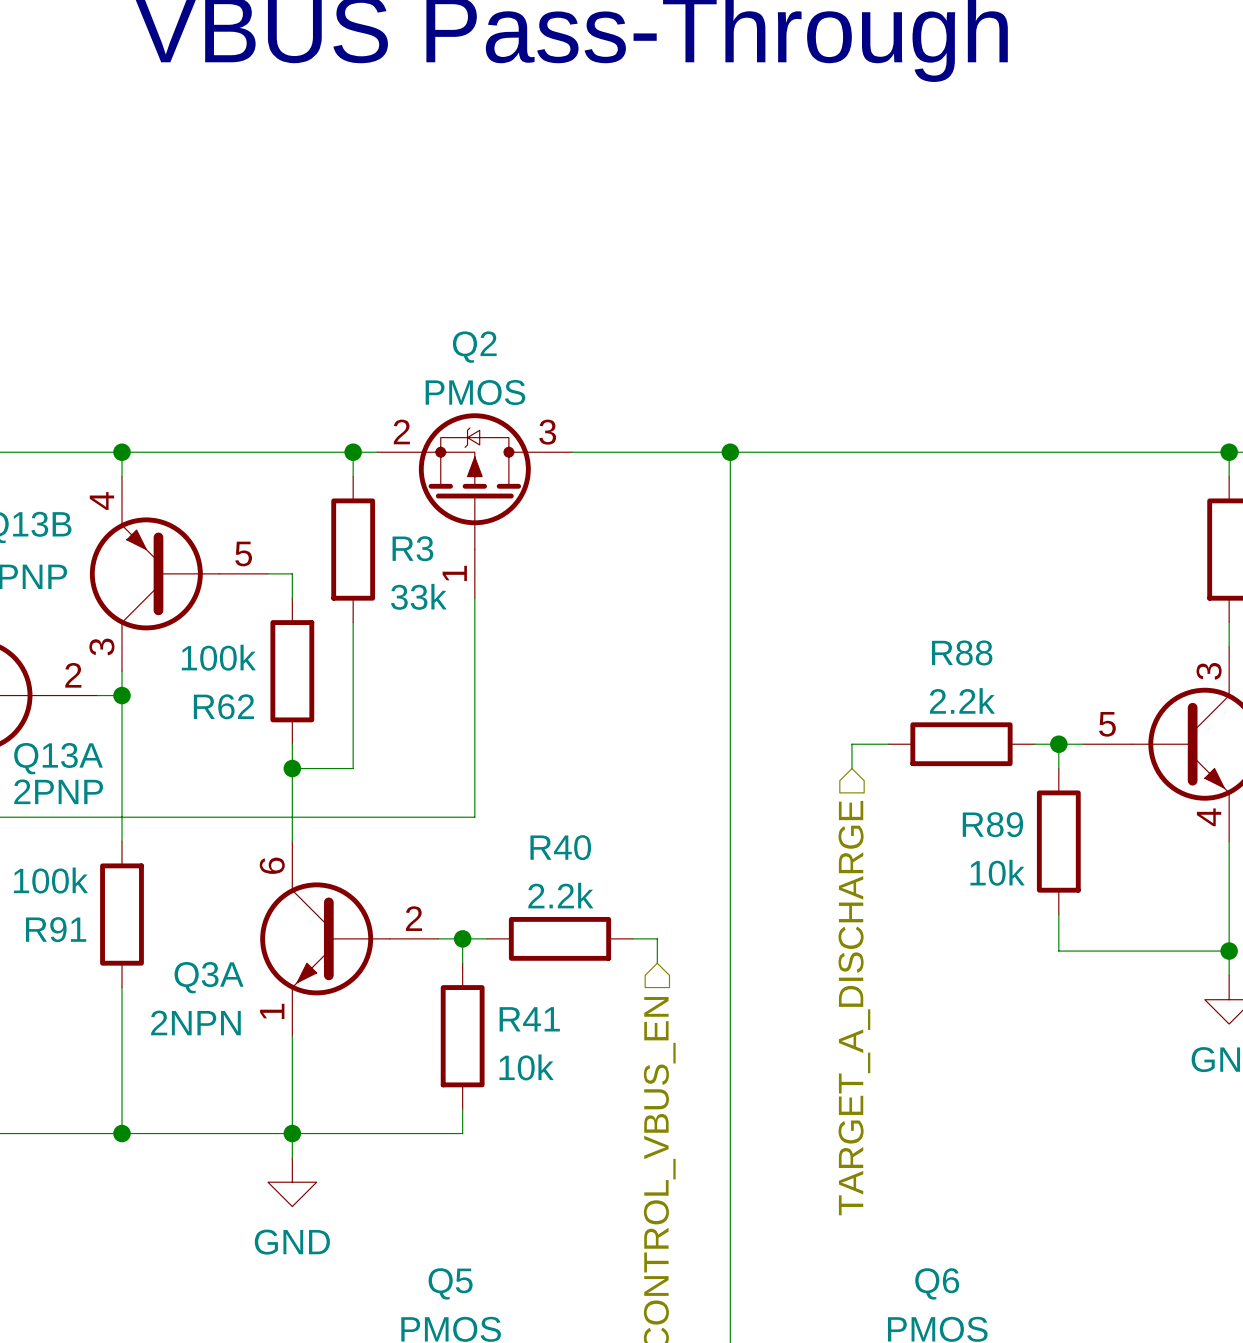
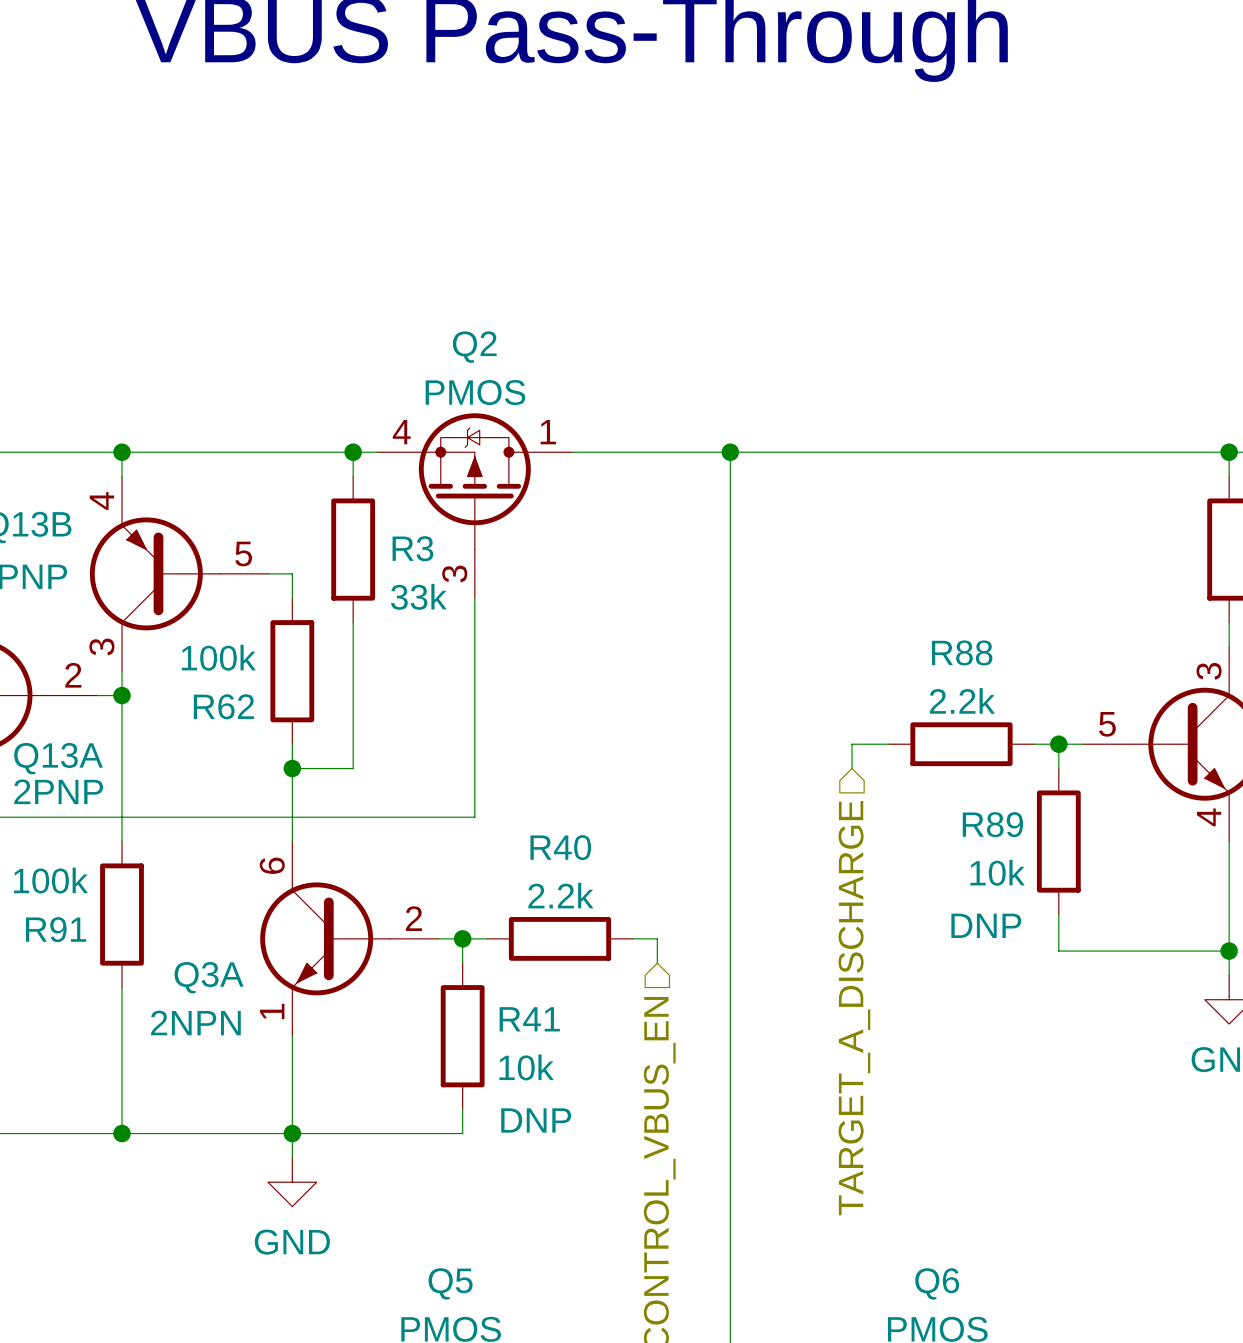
Q2 pin number: 2 (401, 431) -> 4 (401, 432)
Q2 pin number: 3 (547, 432) -> 1 (548, 432)
Q2 pin number: 1 (454, 573) -> 3 (454, 573)
R89 text: none -> DNP (986, 925)
R41 text: none -> DNP (536, 1120)

